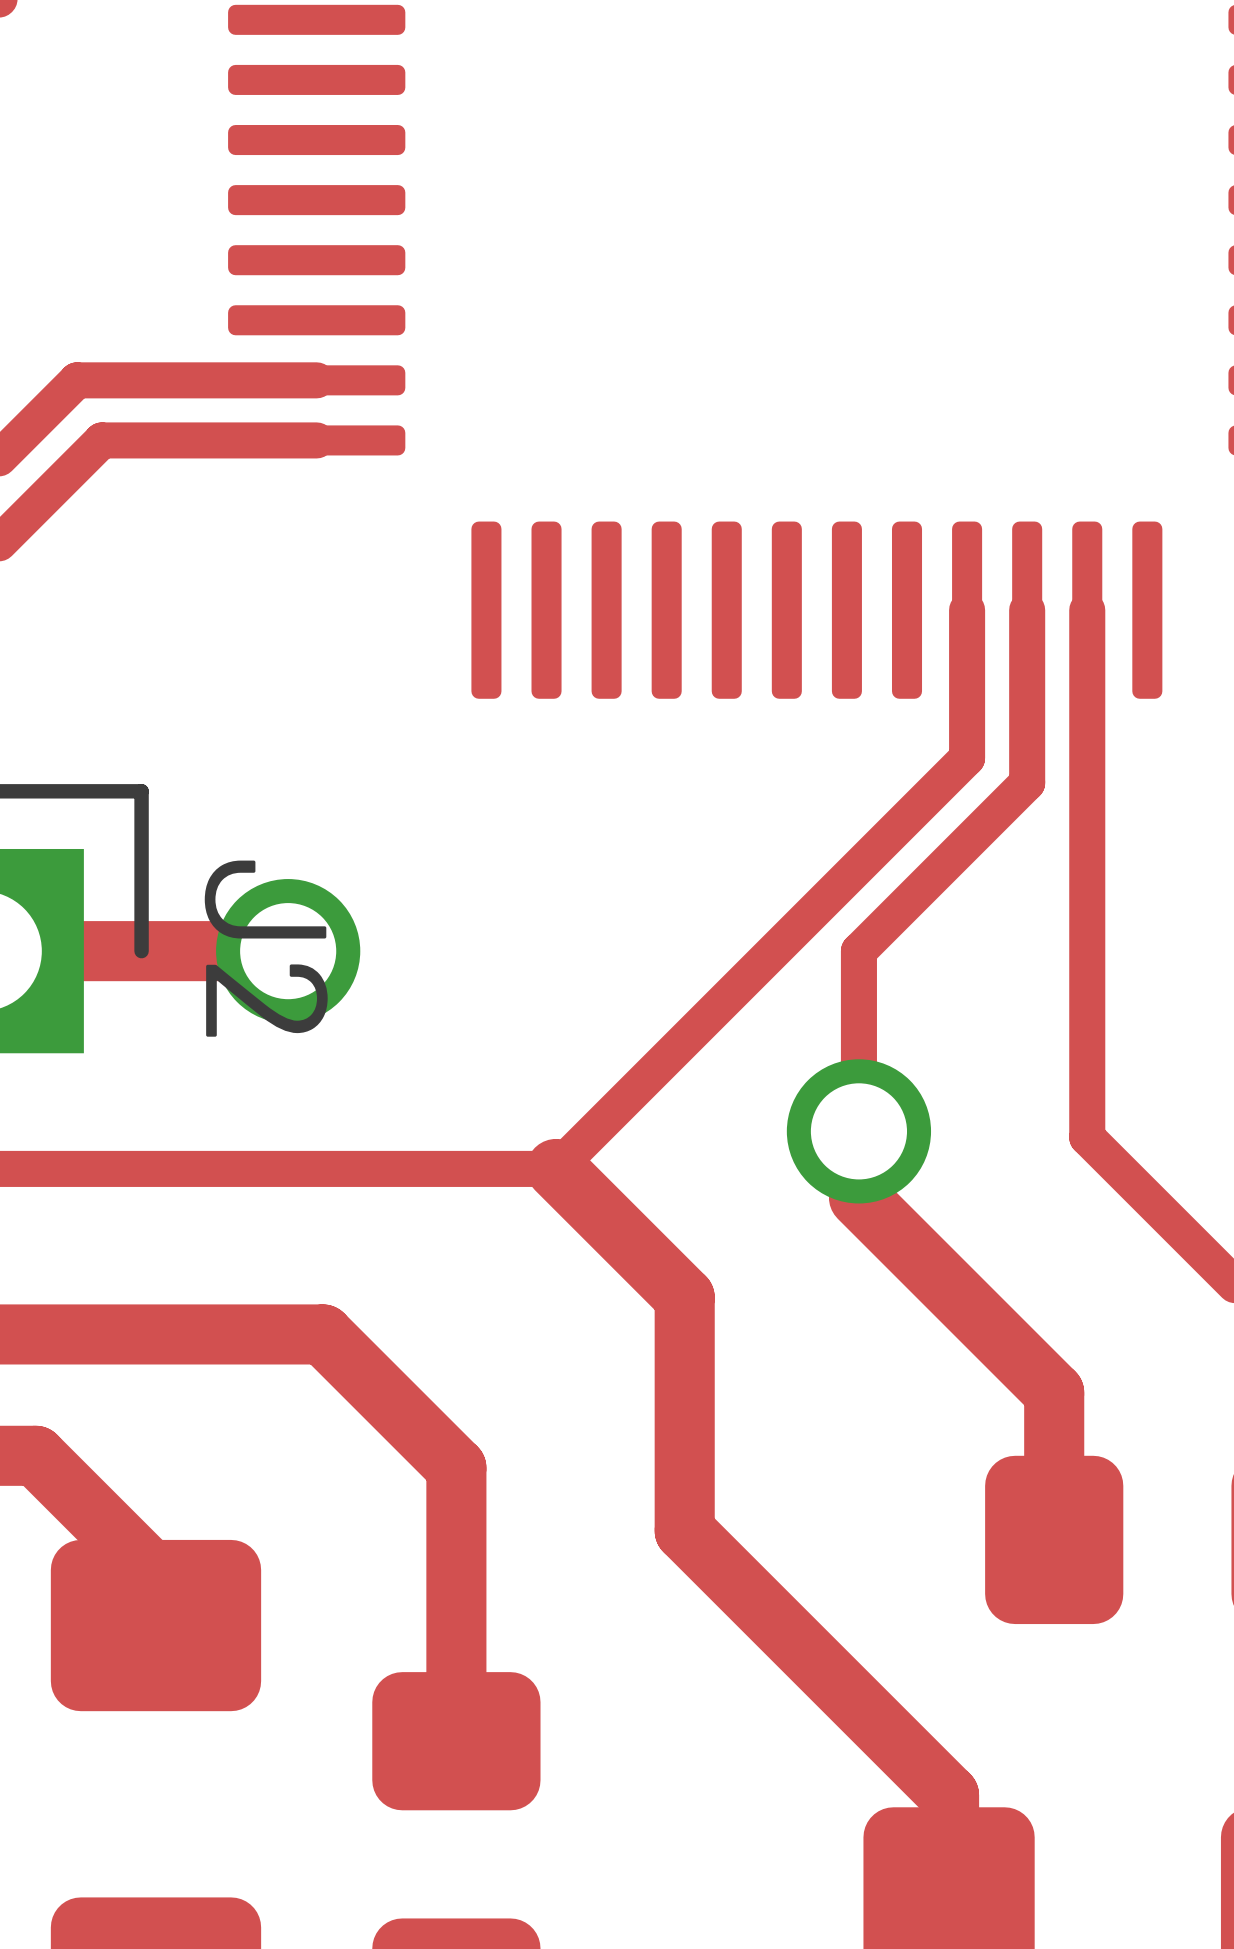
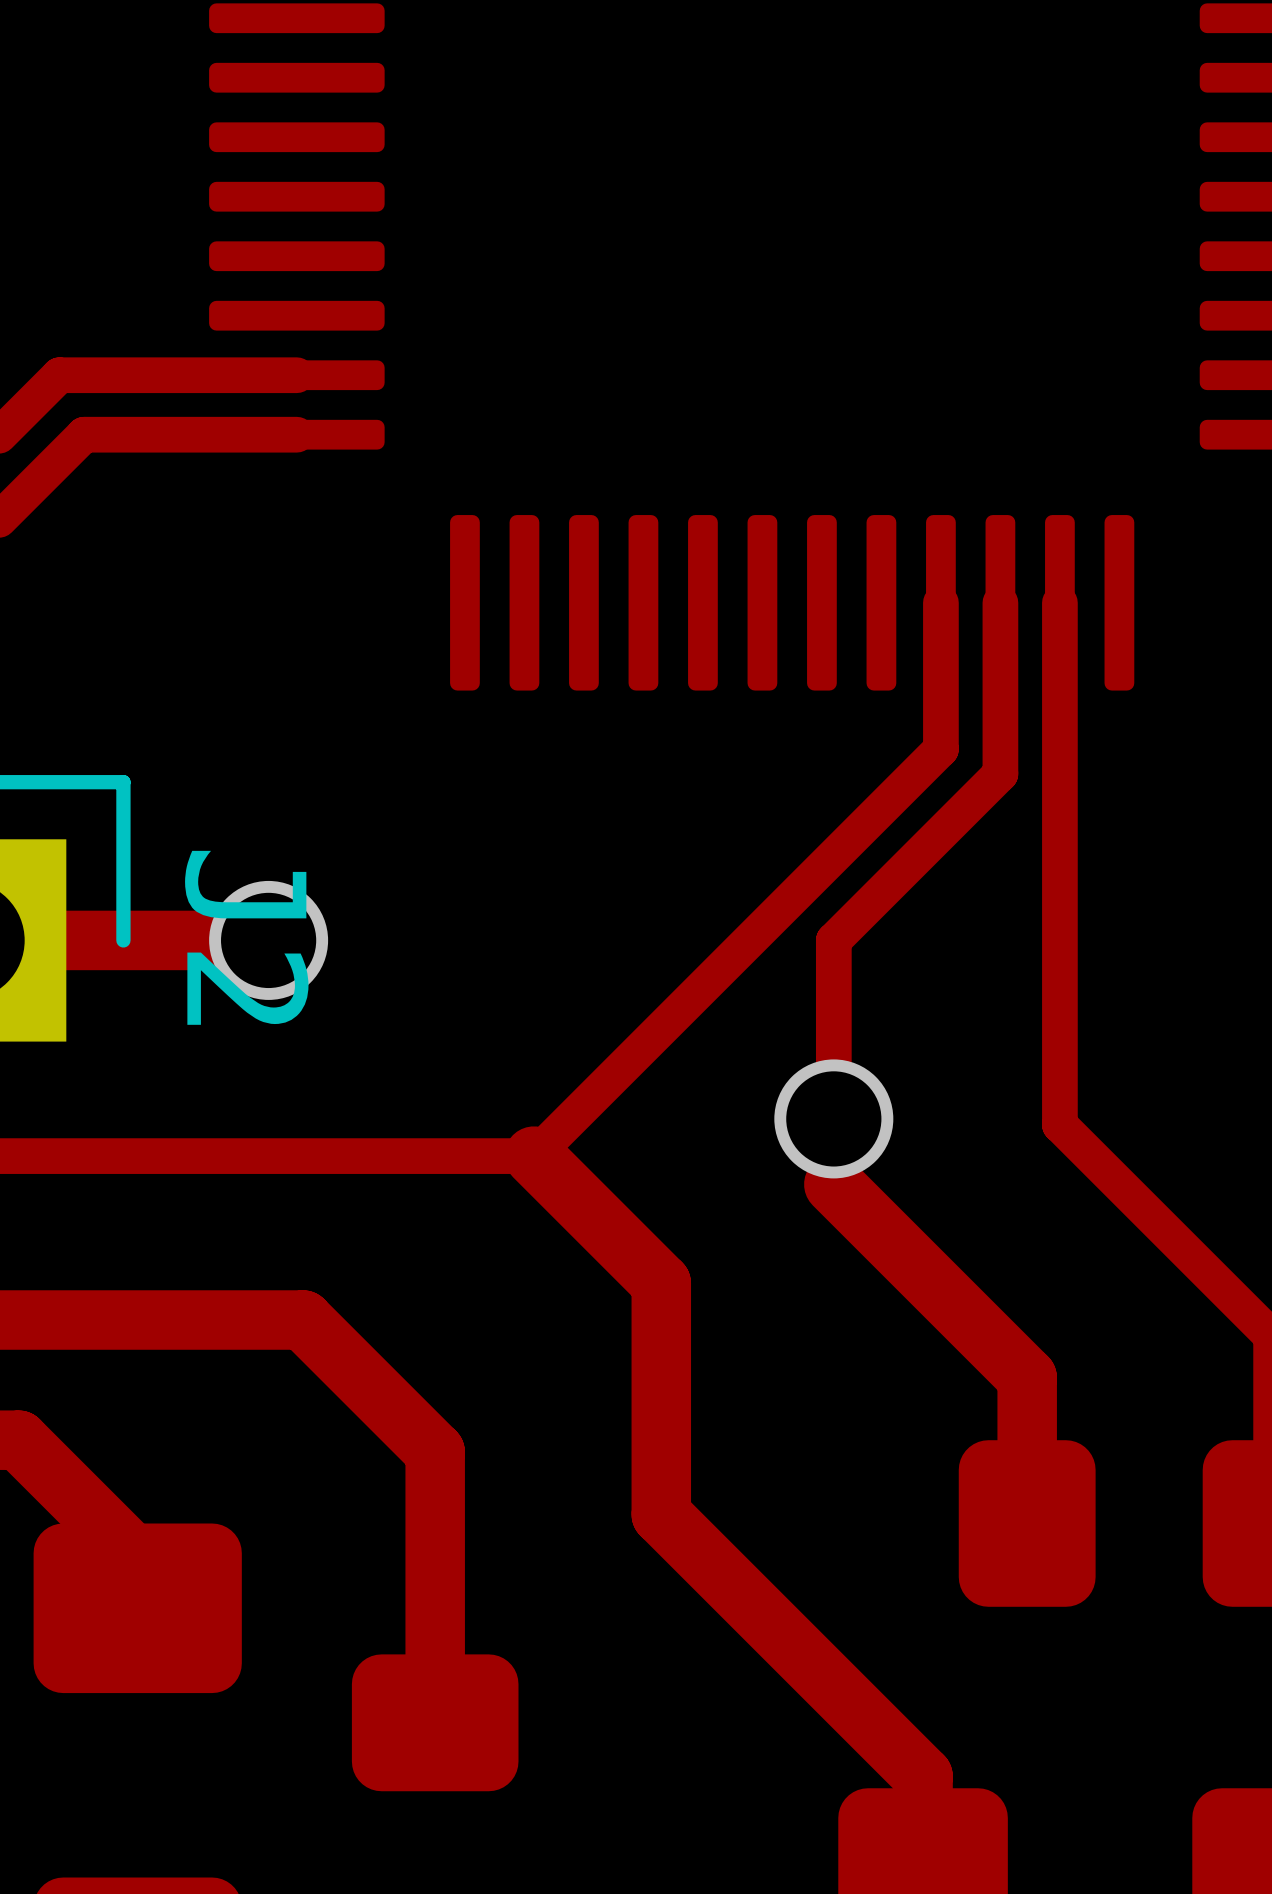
via size: [216, 879, 361, 1024] -> [209, 880, 329, 1000]
via size: [786, 1059, 932, 1204] -> [774, 1059, 894, 1179]

